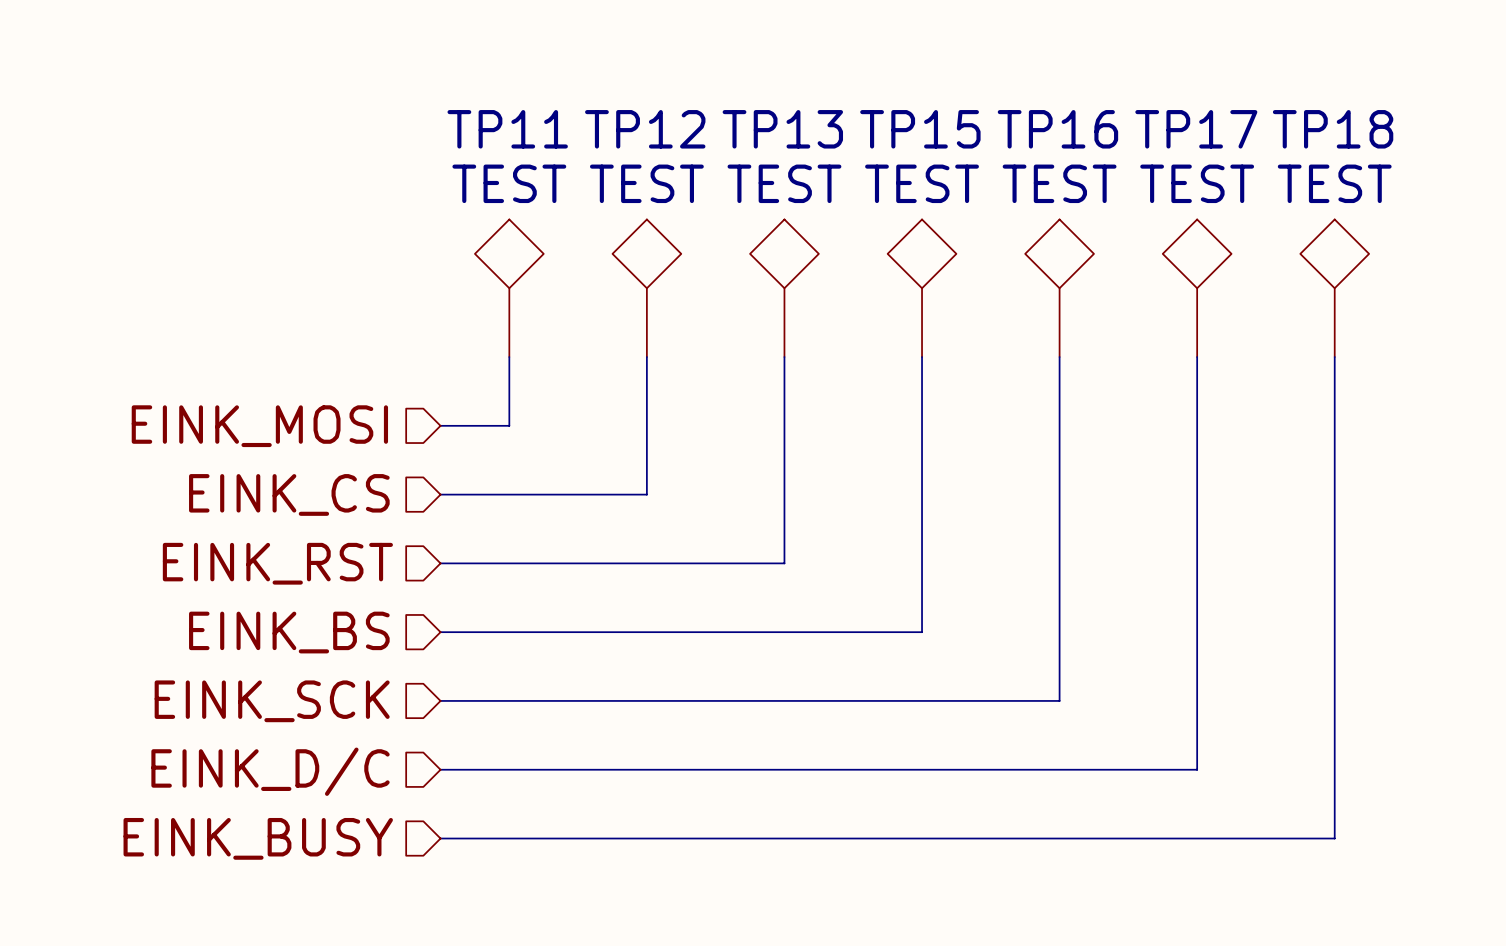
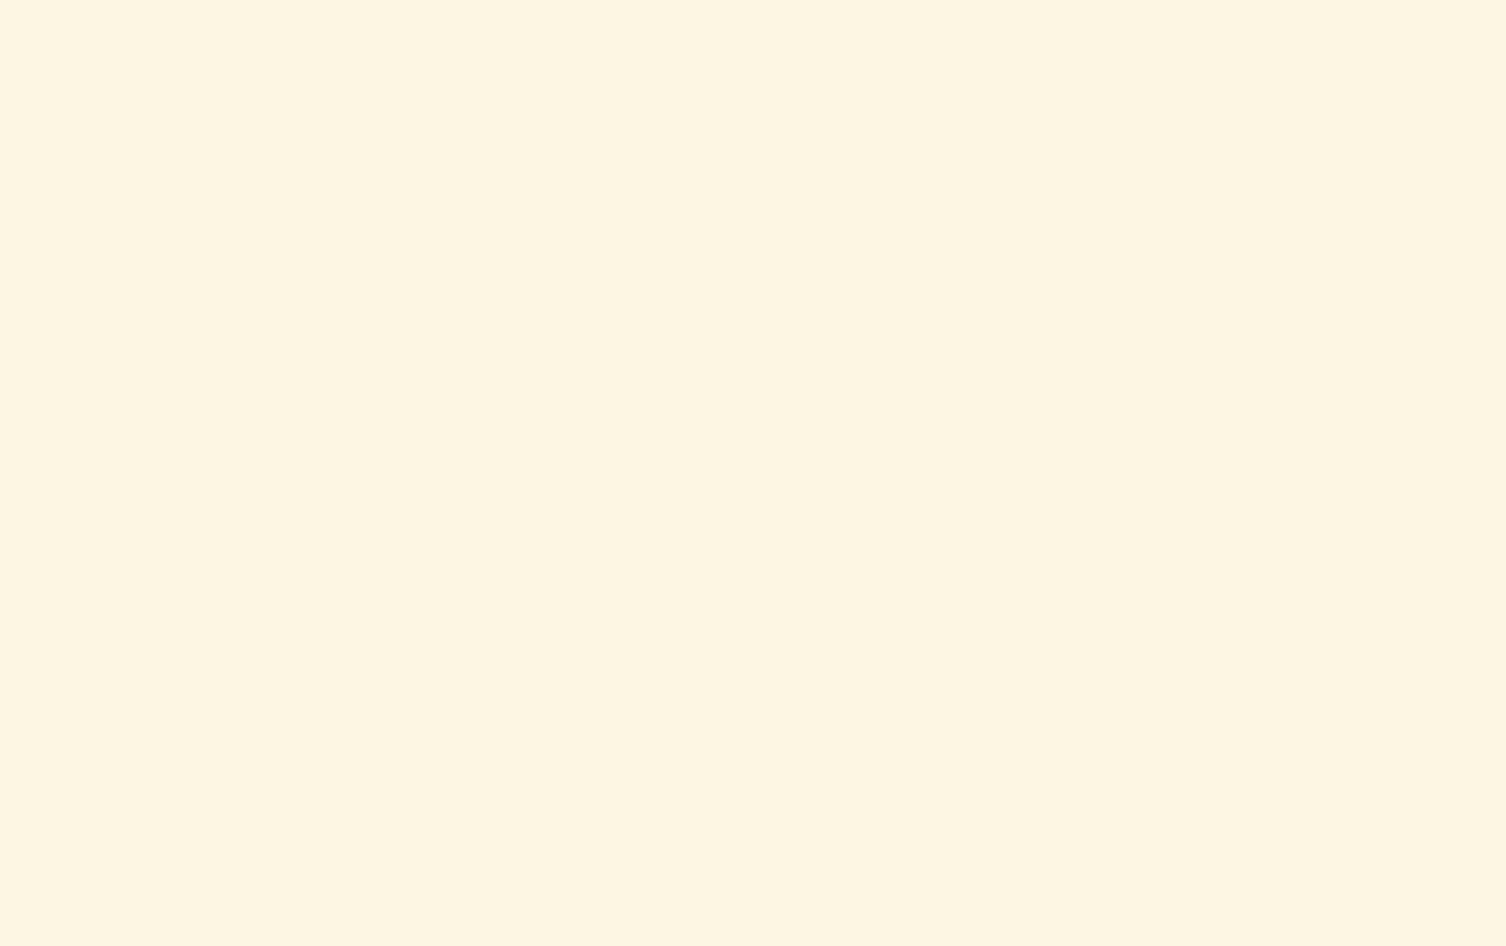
TP11: TEST (509, 288) -> none
TP12: TEST (646, 288) -> none
TP13: TEST (784, 288) -> none
TP15: TEST (922, 288) -> none
TP16: TEST (1059, 288) -> none
TP17: TEST (1197, 288) -> none
TP18: TEST (1334, 288) -> none
wire: (509, 357) (509, 425) (440, 425) -> none
wire: (646, 357) (646, 494) (440, 494) -> none
wire: (784, 357) (784, 563) (440, 563) -> none
wire: (922, 357) (922, 632) (440, 632) -> none
wire: (1059, 357) (1059, 700) (440, 700) -> none
wire: (1197, 357) (1197, 769) (440, 769) -> none
wire: (1334, 357) (1334, 838) (440, 838) -> none
hierarchical label: EINK_MOSI (259, 426) -> none
hierarchical label: EINK_CS (289, 494) -> none
hierarchical label: EINK_RST (277, 563) -> none
hierarchical label: EINK_BS (289, 632) -> none
hierarchical label: EINK_SCK (272, 701) -> none
hierarchical label: EINK_D/C (270, 771) -> none
hierarchical label: EINK_BUSY (258, 838) -> none

